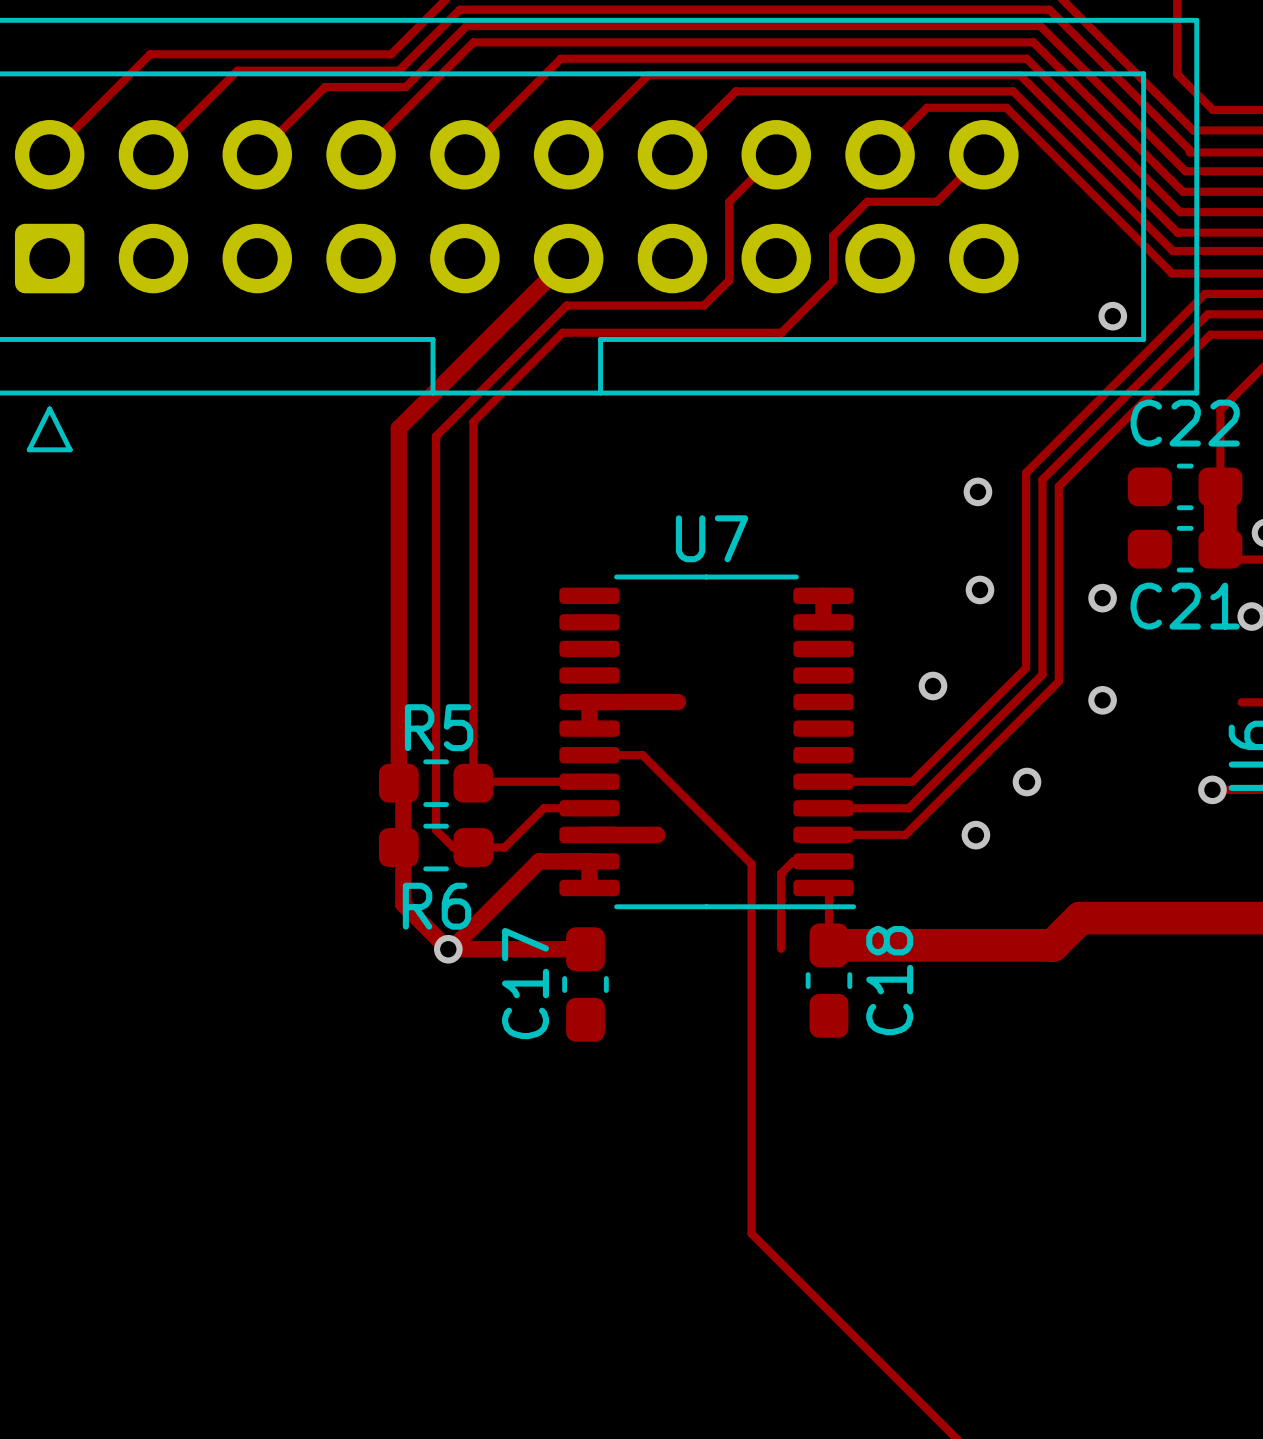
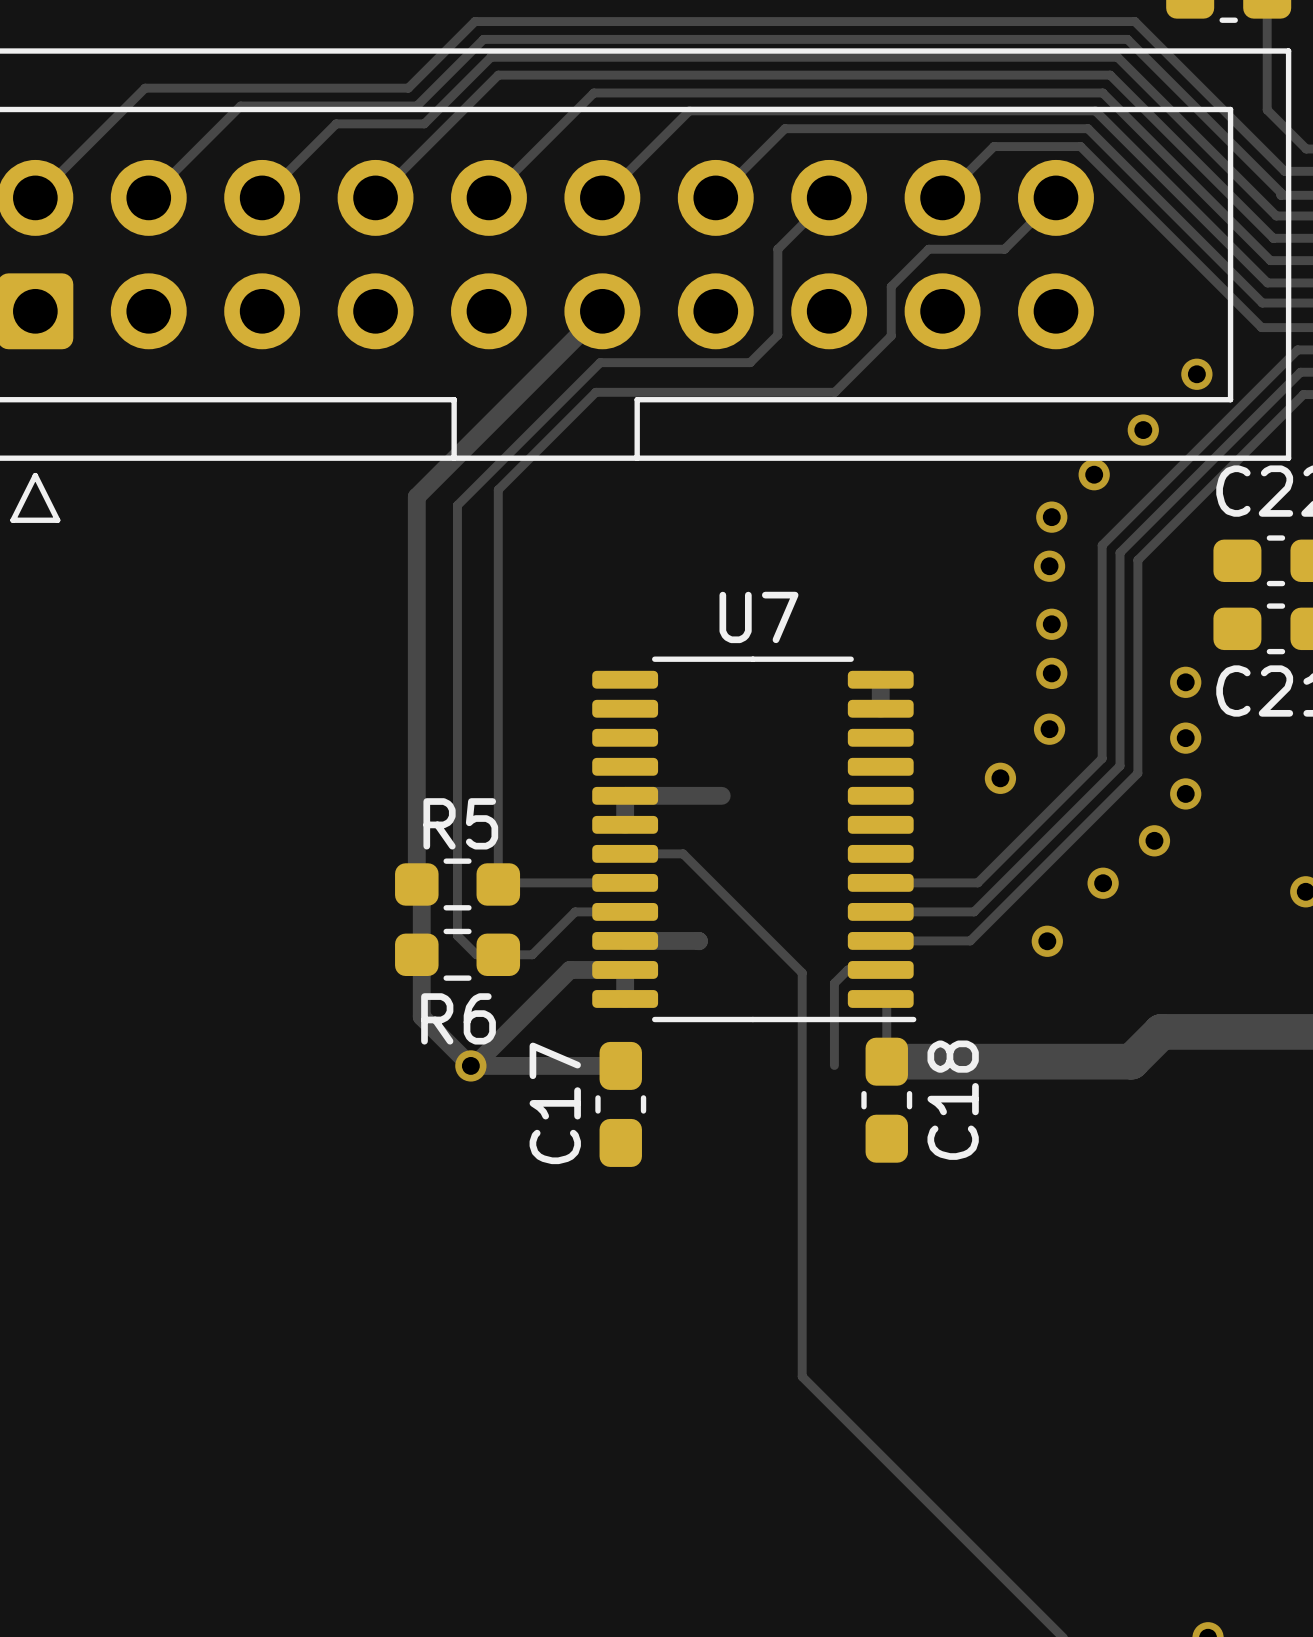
via: none -> (1143, 430)
via: none -> (1094, 474)
via: none -> (1051, 517)
via: none -> (1051, 624)
via: none -> (1049, 729)
via: none -> (1185, 738)
via: none -> (1154, 840)

